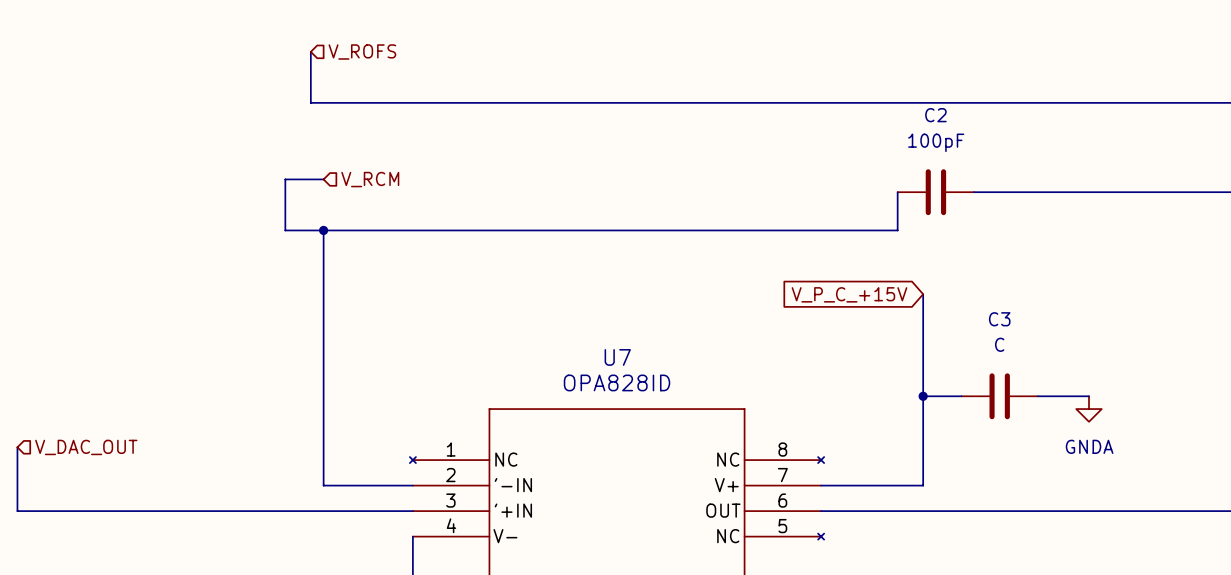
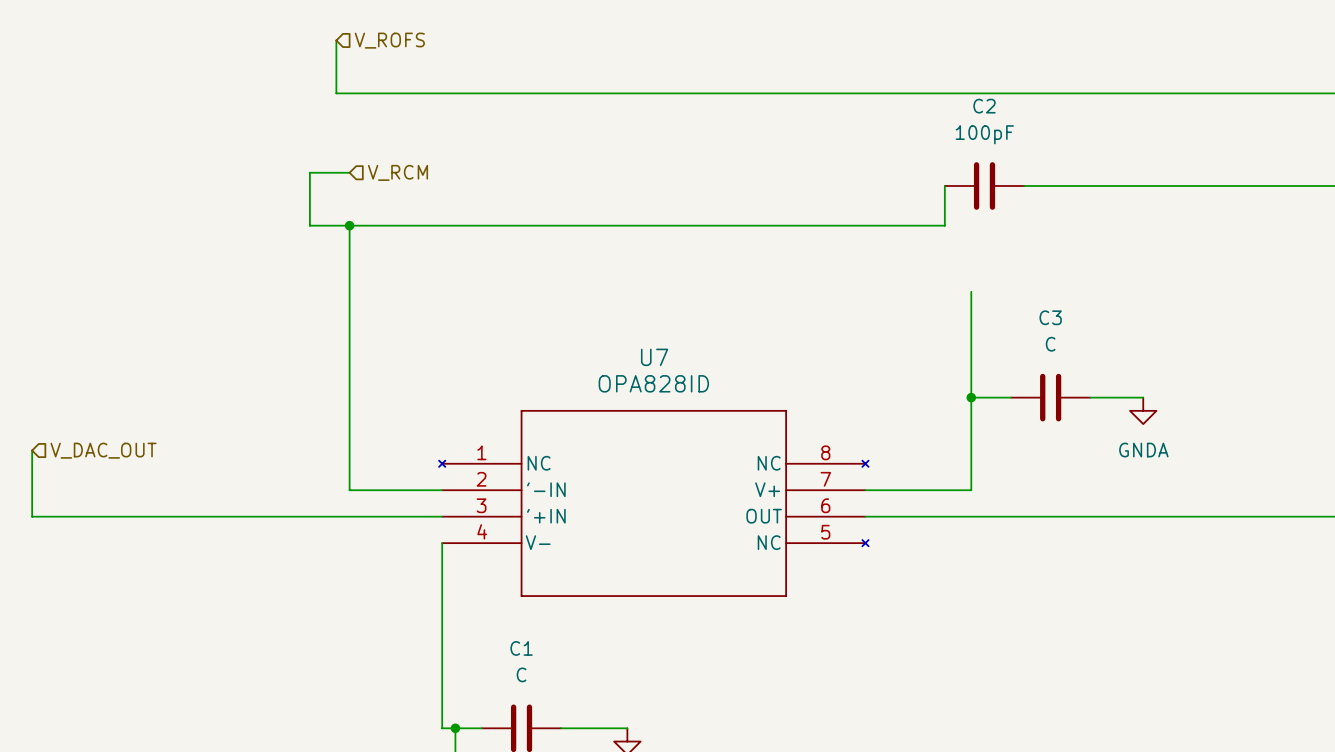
global label: V_P_C_+15V (849, 294) -> none

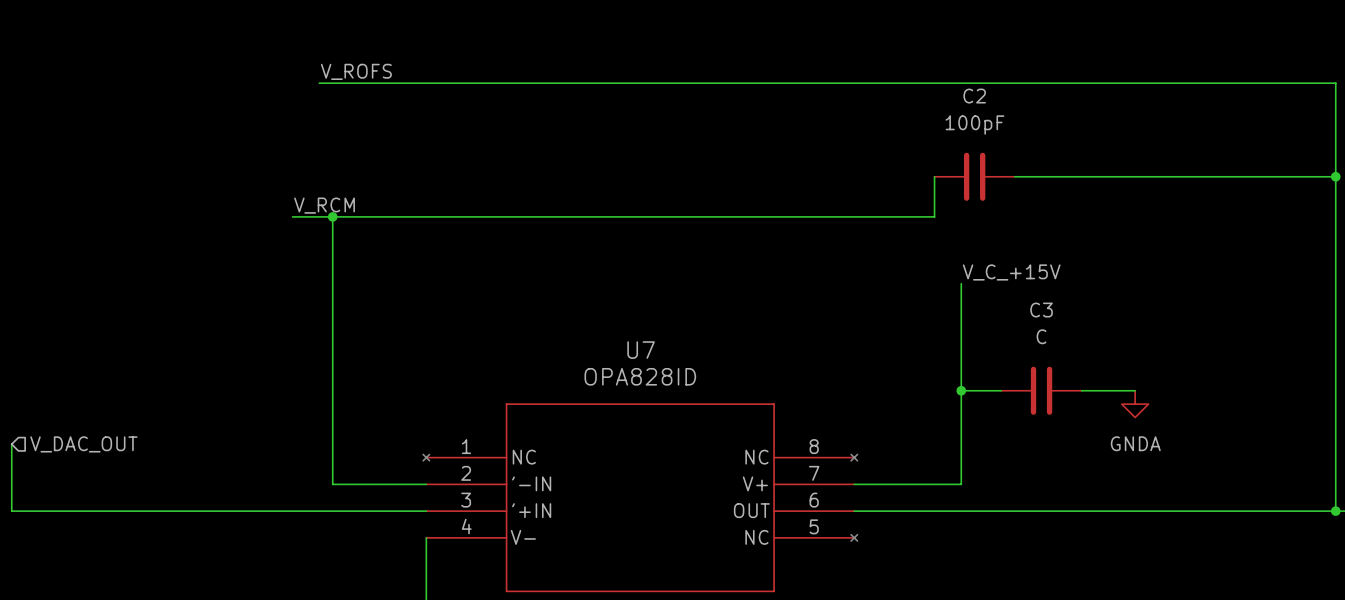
wire: (336, 40) (336, 93) -> none
hierarchical label: V_ROFS (389, 40) -> none
label: none -> V_ROFS (356, 71)
wire: (349, 172) (309, 172) (309, 225) -> none
hierarchical label: V_RCM (397, 172) -> none
label: none -> V_RCM (324, 205)
label: none -> V_C_+15V (1011, 272)

